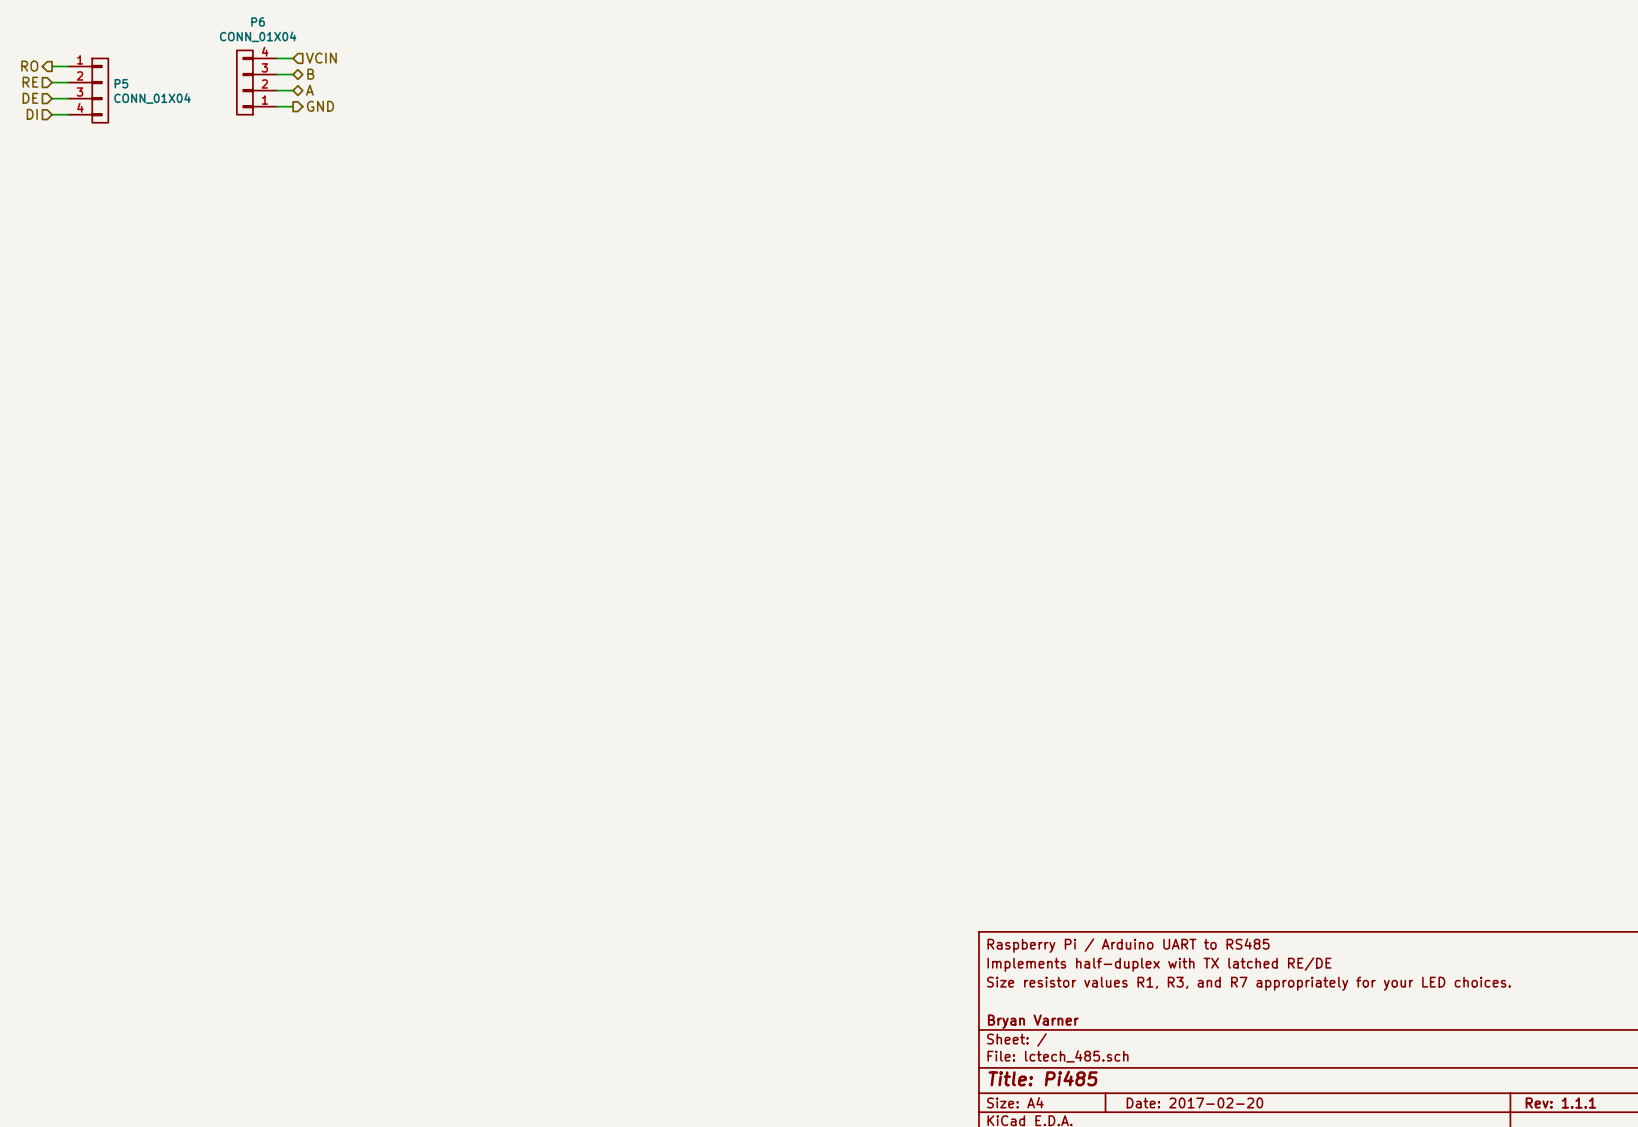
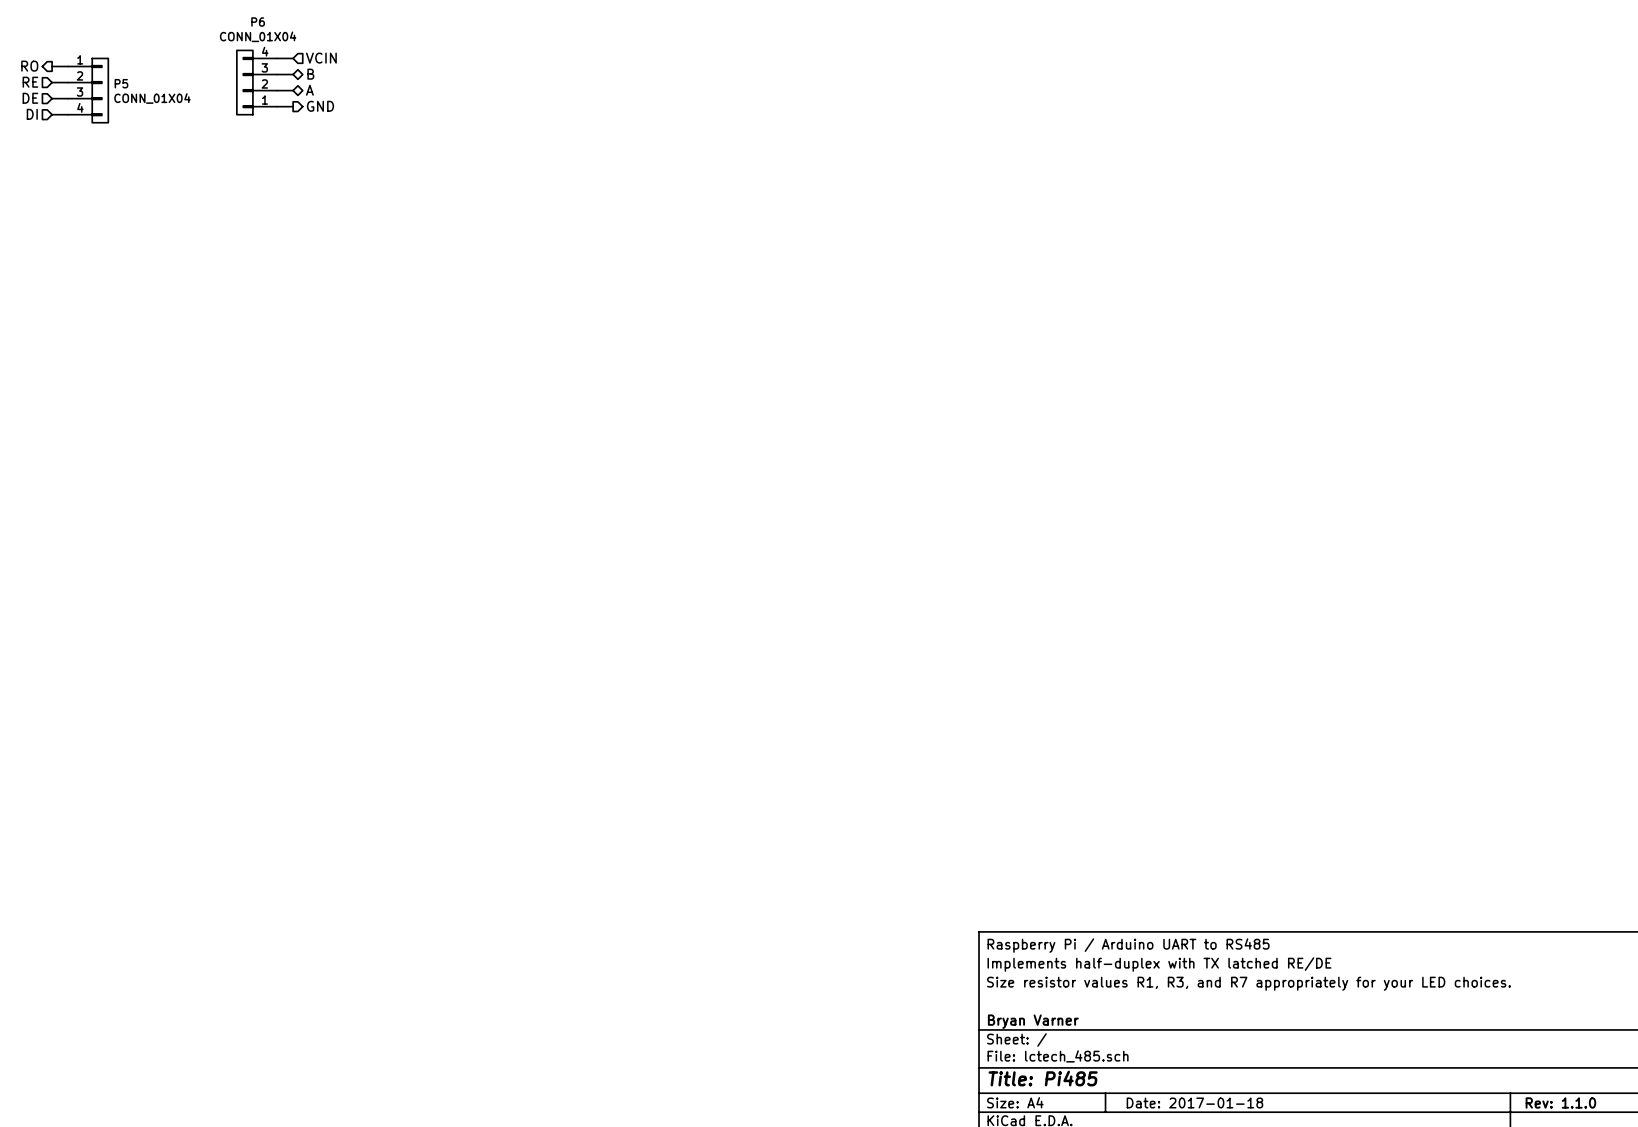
title block: Date: 2017-02-20 (1194, 1102) -> Date: 2017-01-18 (1194, 1102)
title block: Rev: 1.1.1 (1560, 1102) -> Rev: 1.1.0 (1560, 1102)

